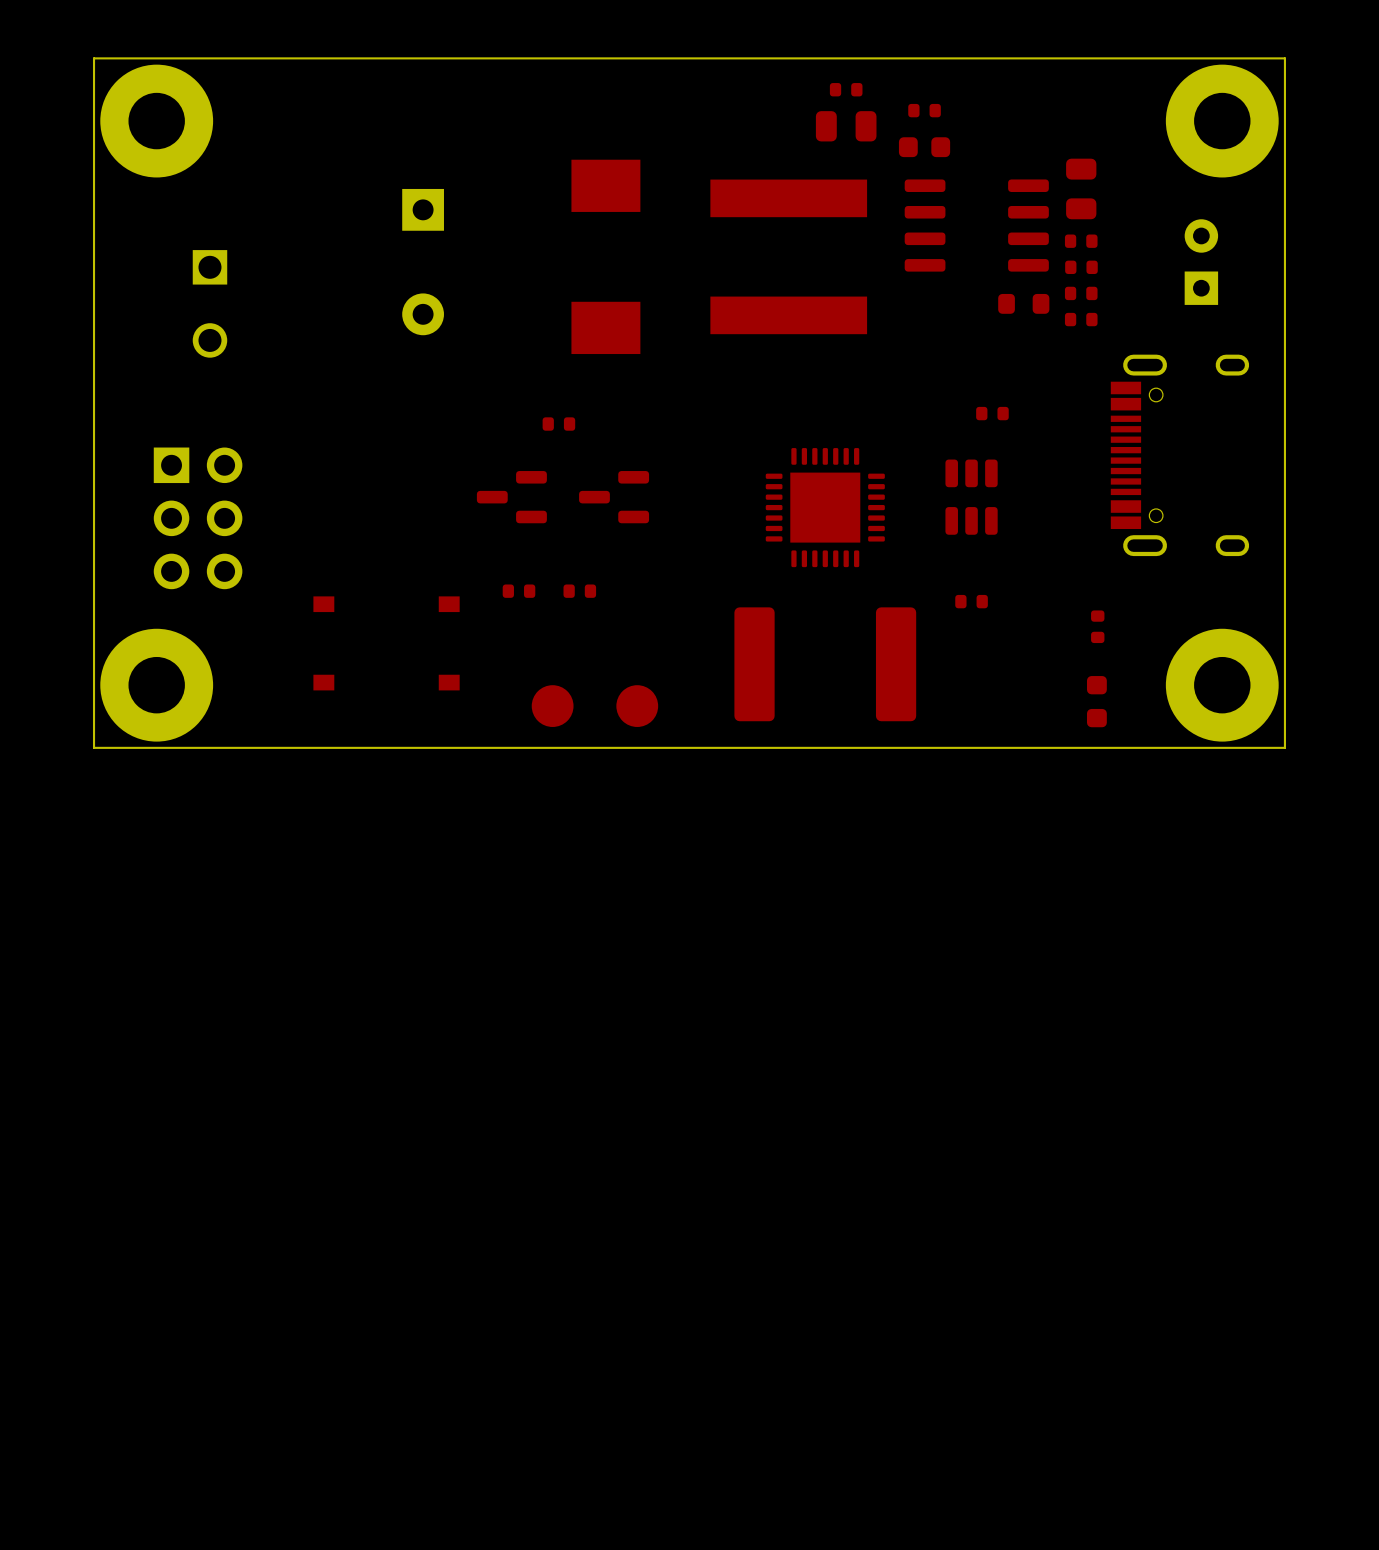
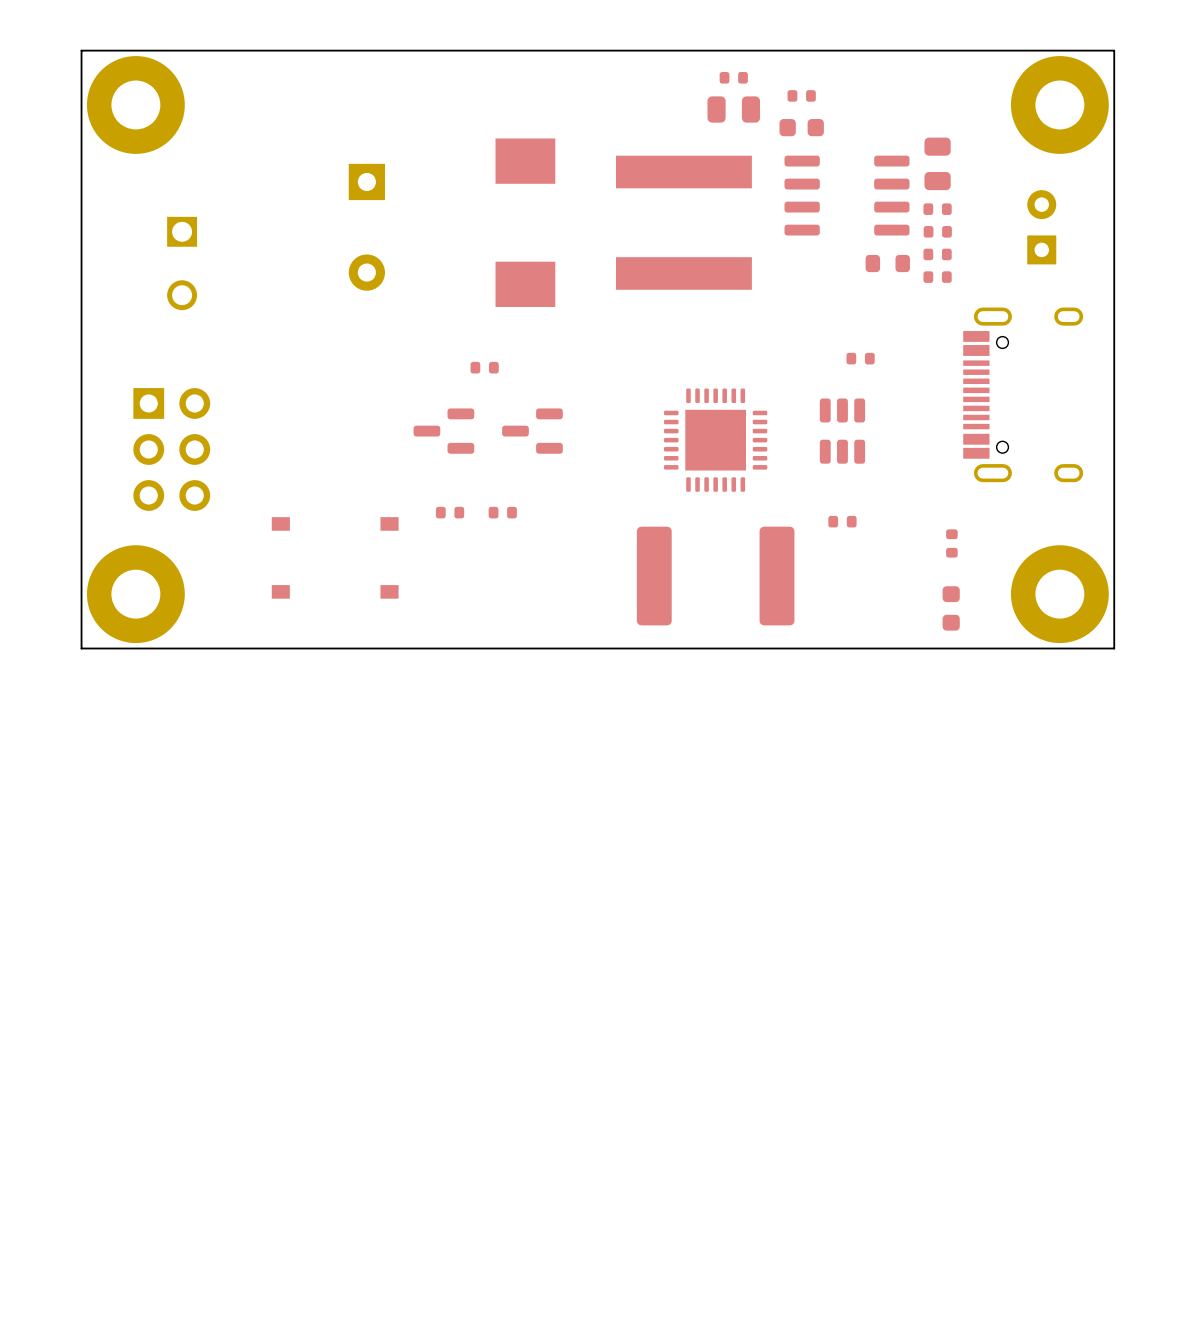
part: (552, 706) -> none
part: (637, 706) -> none

